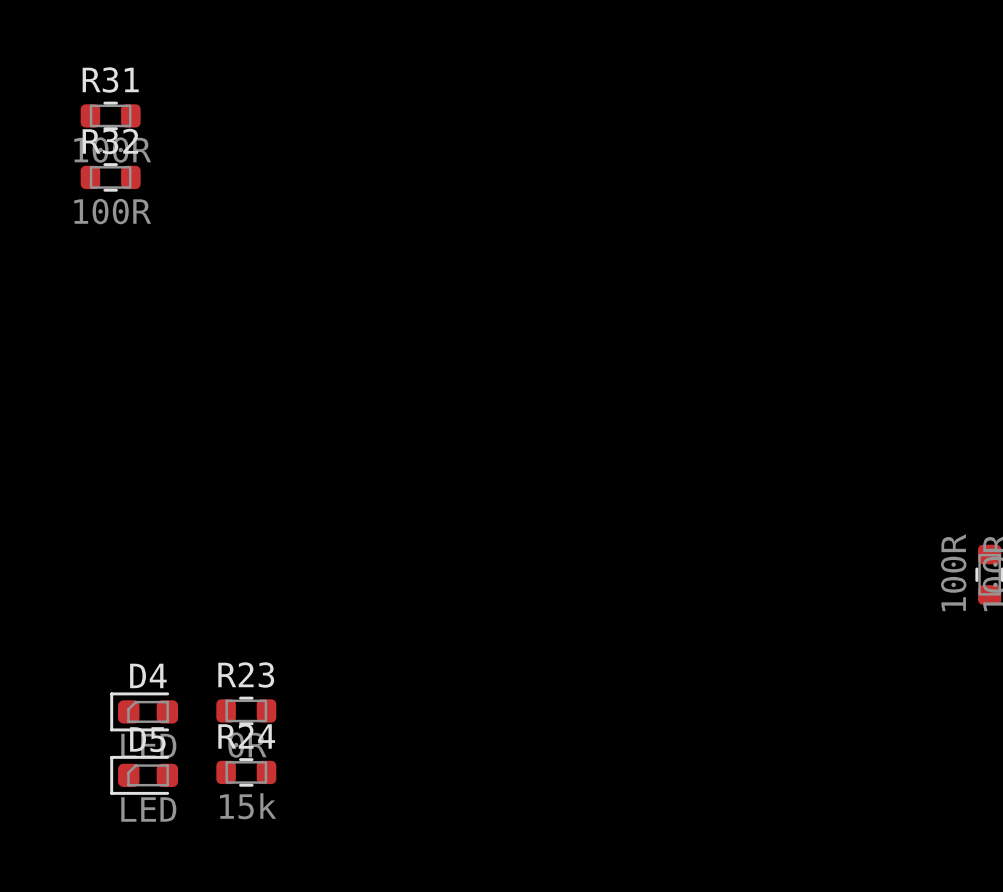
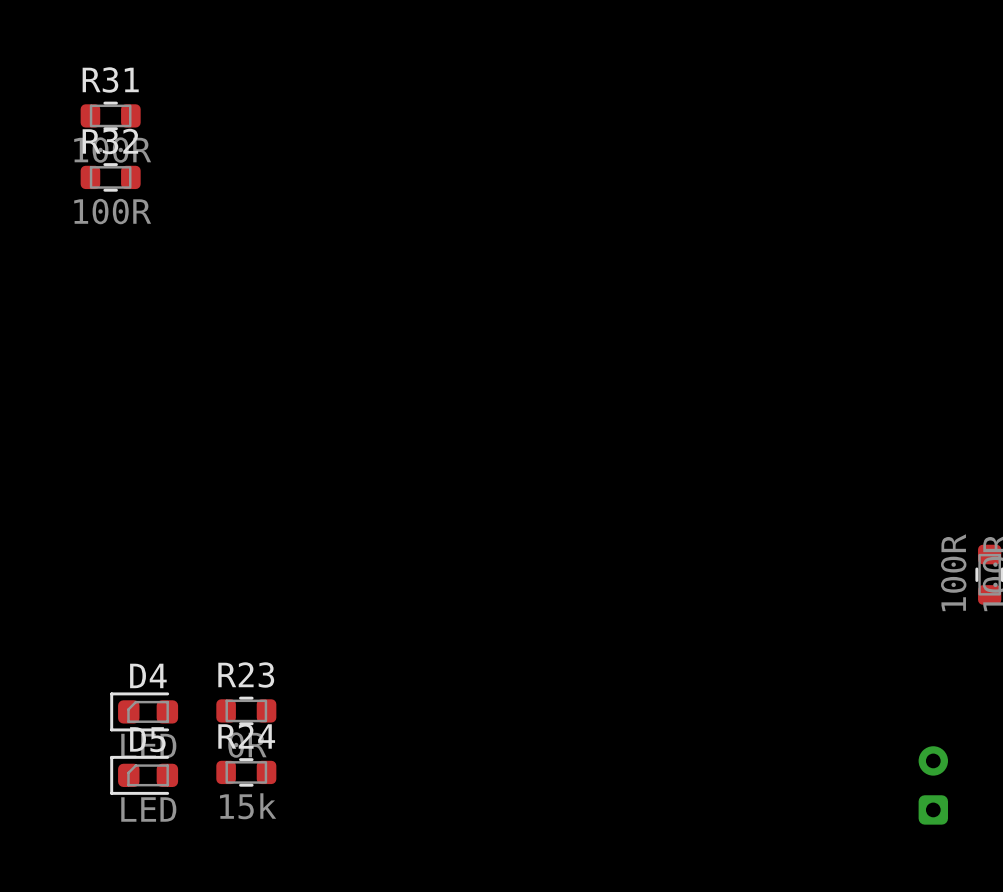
part: none -> (933, 785)

